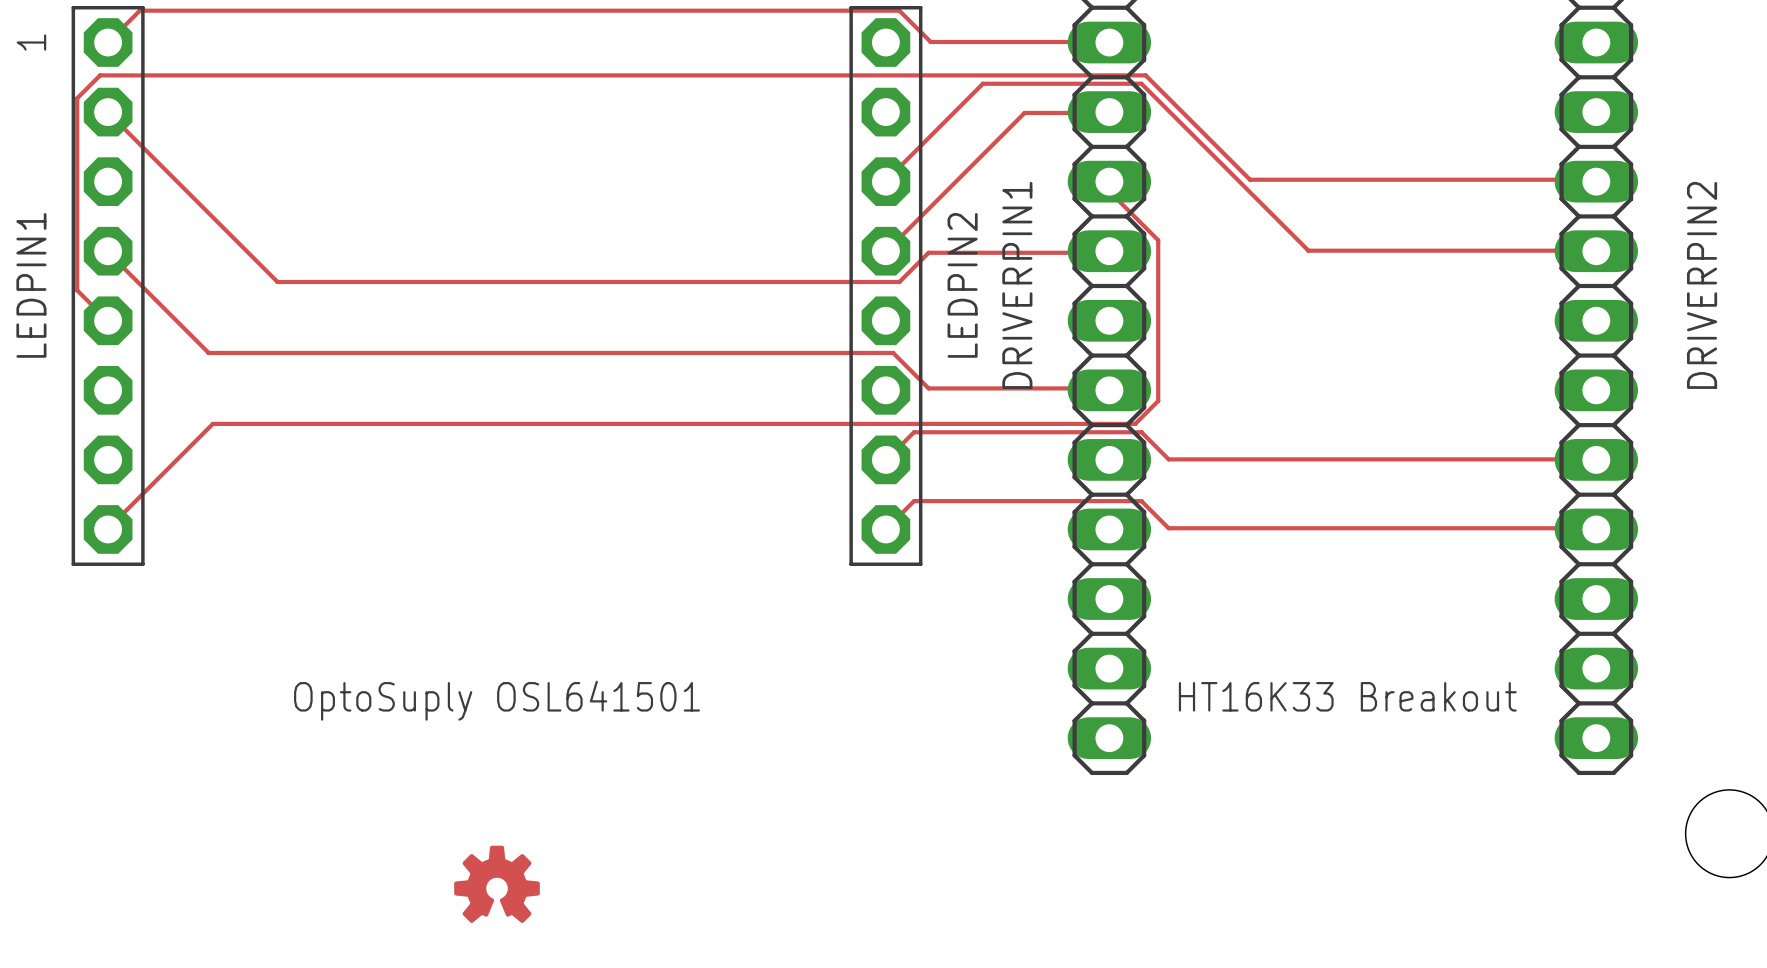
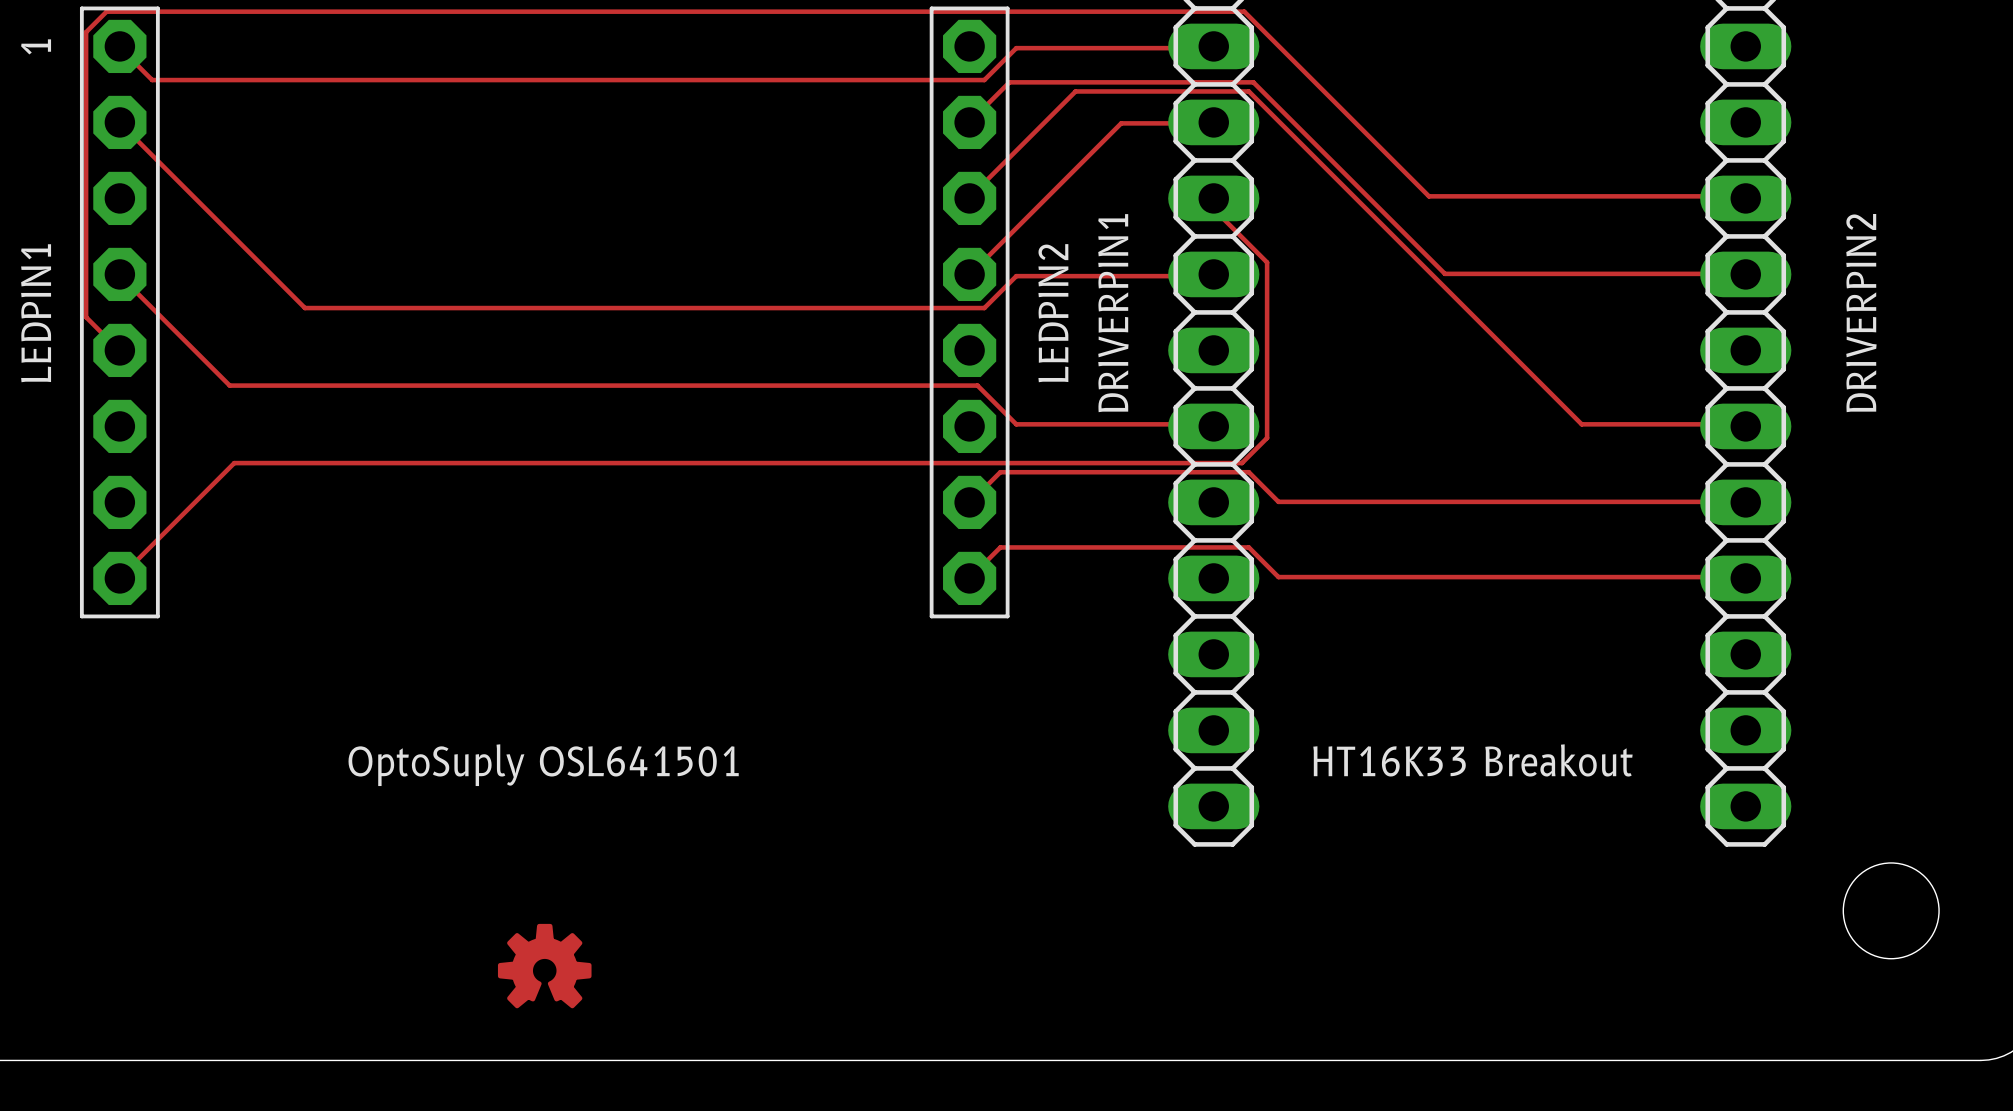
track: (139, 10) (108, 42) -> (154, 11) (106, 11) (86, 32) (86, 107)
track: (899, 10) (930, 42) (1109, 42) -> (984, 11) (1244, 11) (1428, 196)
track: none -> (119, 46) (152, 80) (984, 80) (1016, 48) (1212, 48) (1213, 46)
track: (922, 75) (100, 75) (77, 98) -> (1009, 82) (969, 122)
track: (1250, 179) (1306, 179) -> (1367, 196) (1444, 273)
track: (1308, 250) (1320, 250) -> (1431, 273) (1581, 424) (1743, 424) (1745, 426)

